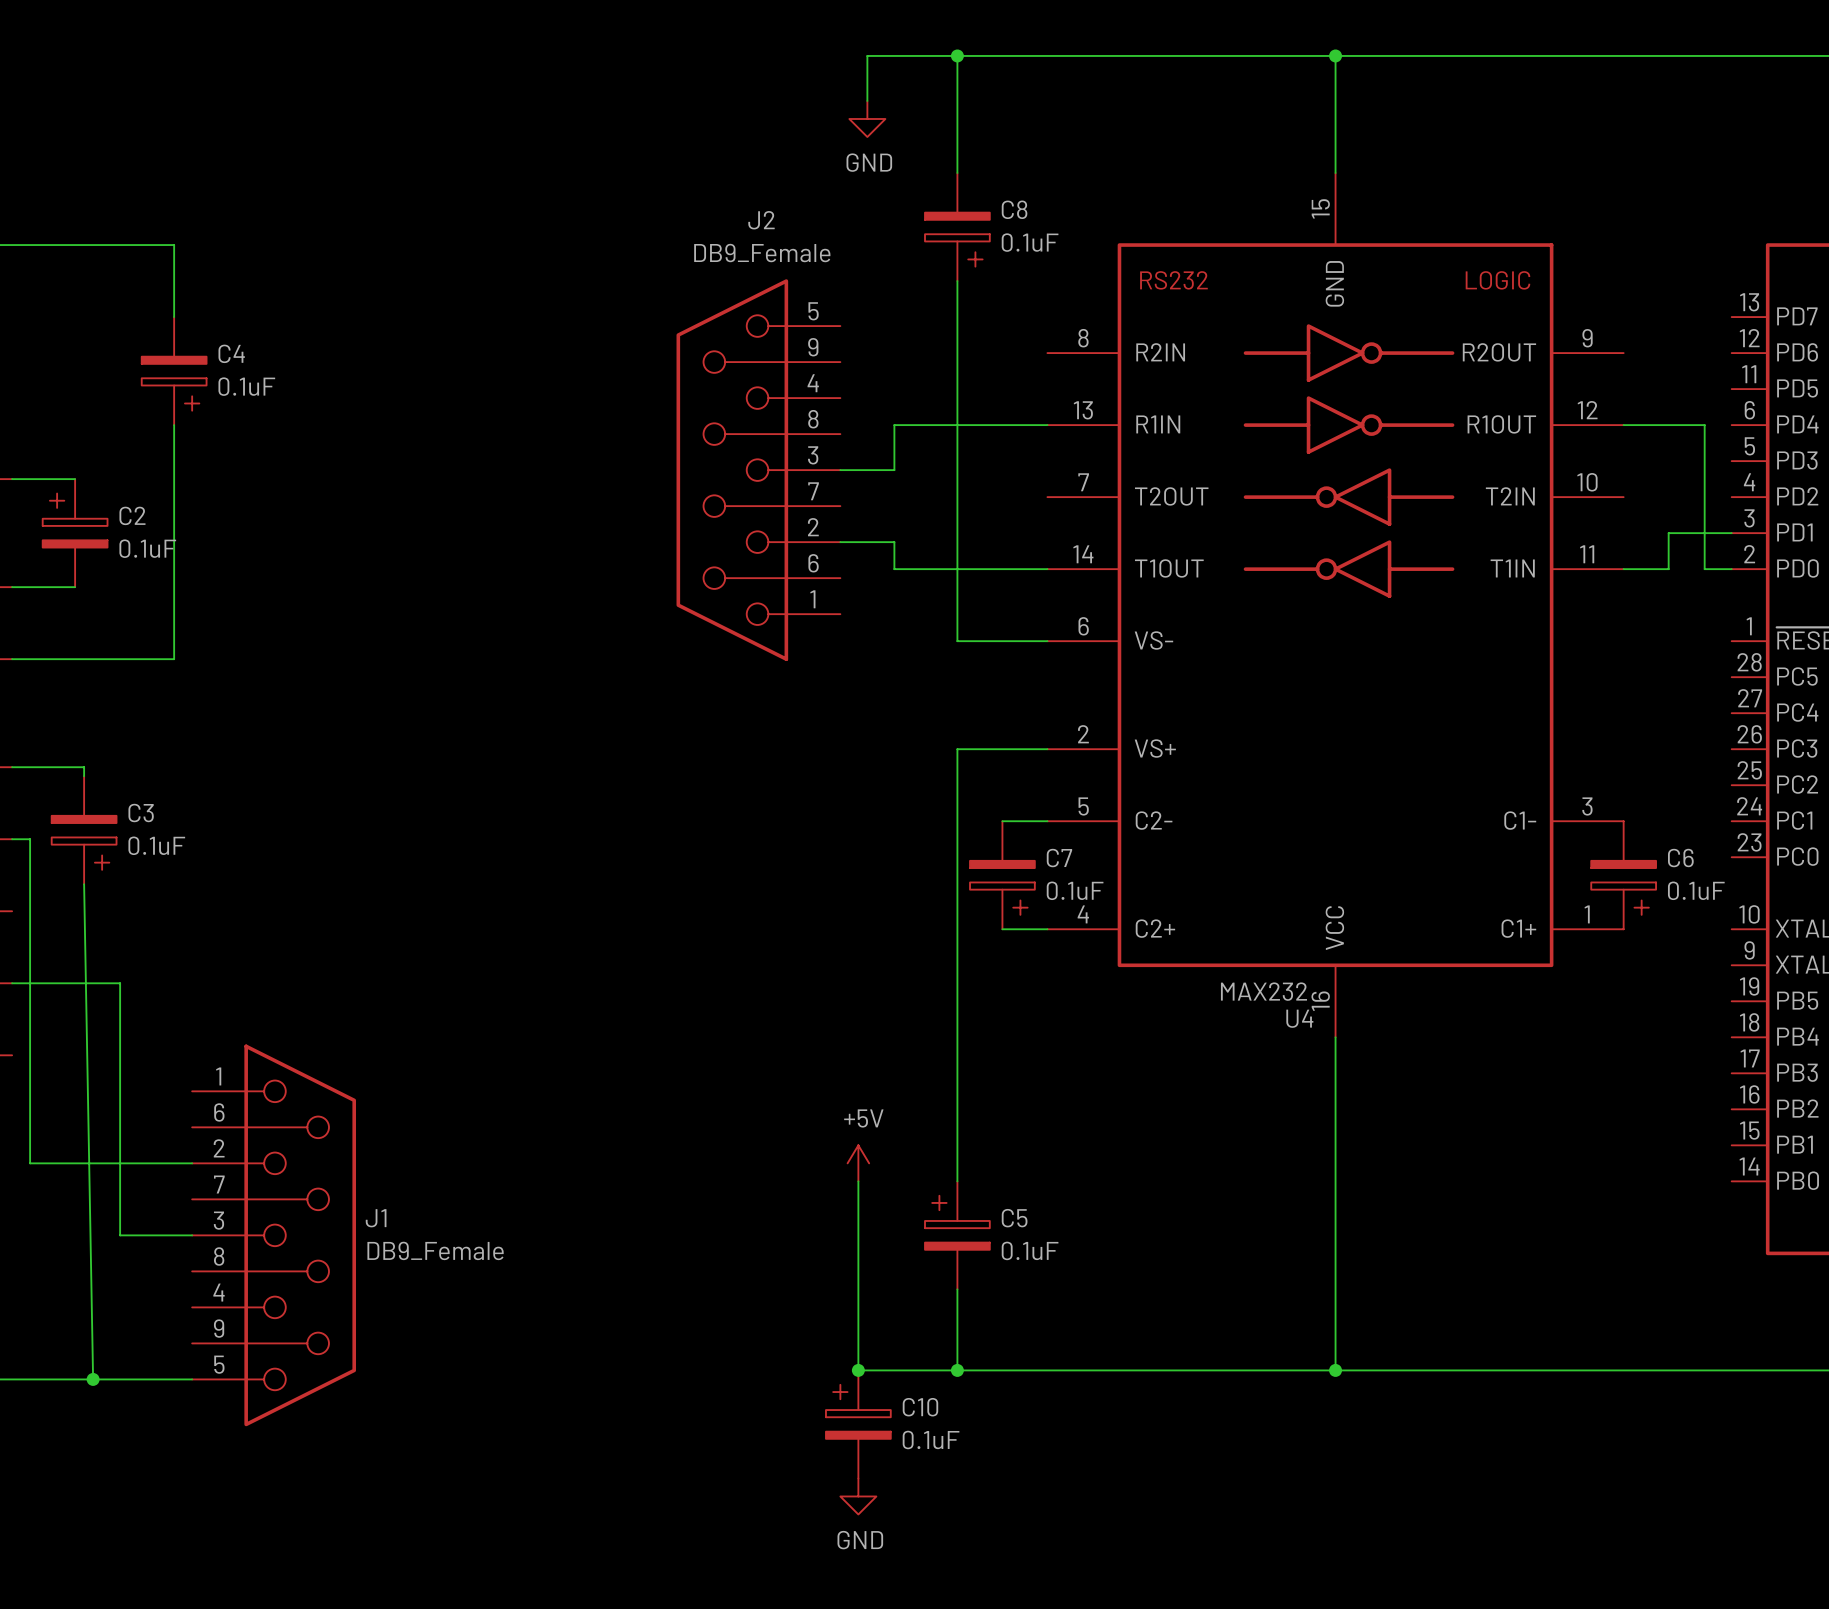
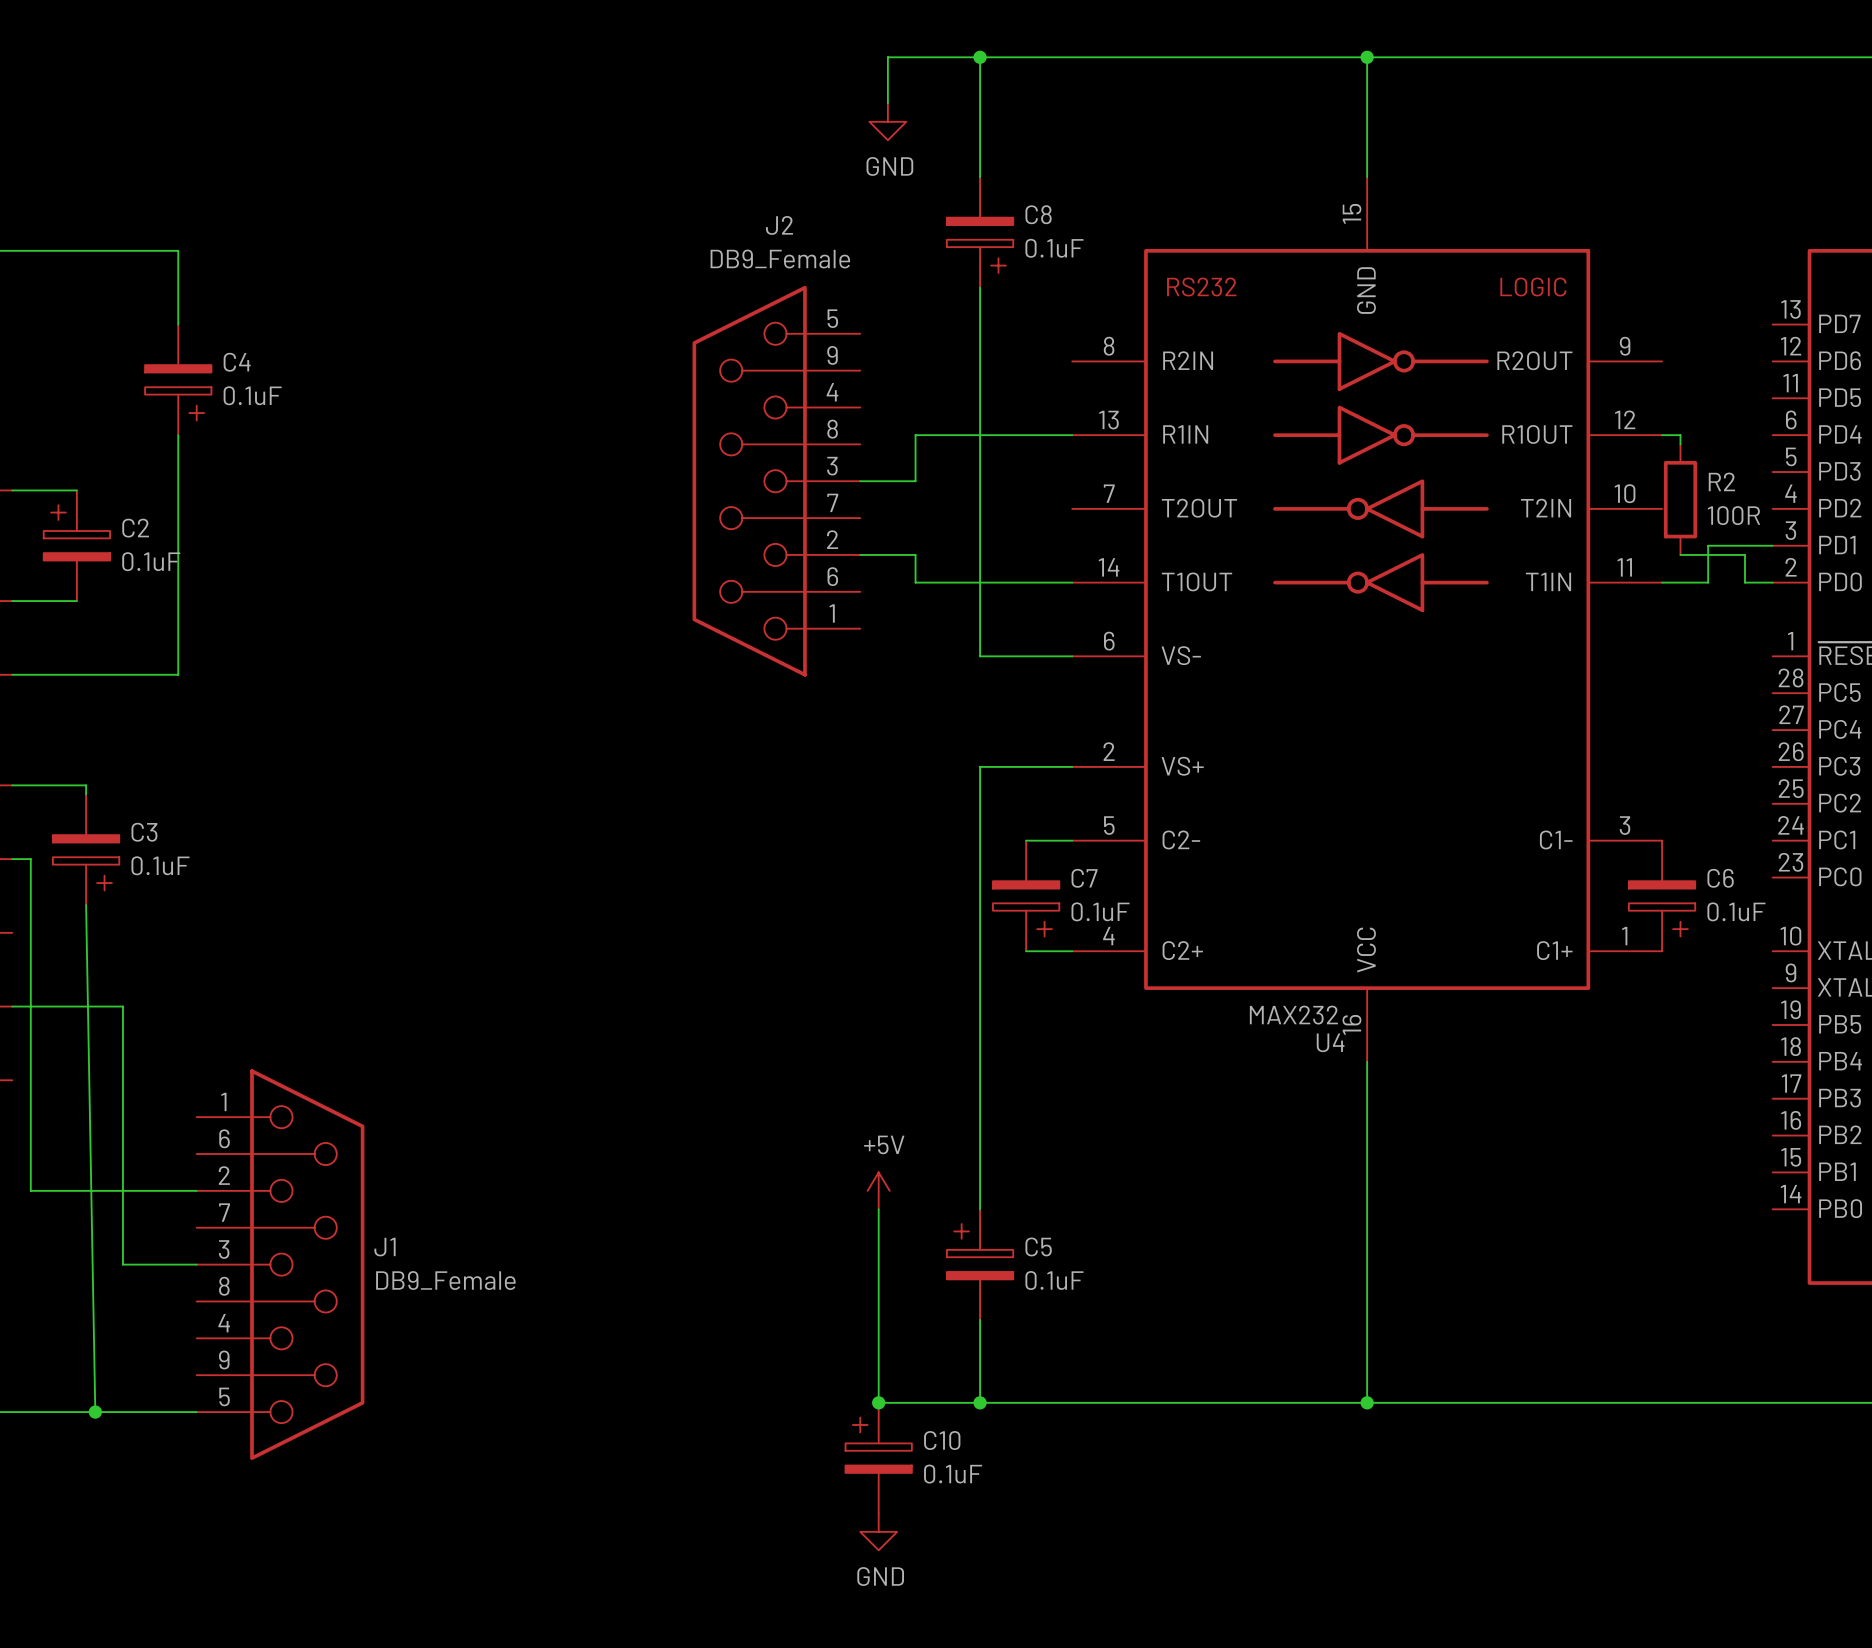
wire: (1641, 425) (1704, 425) (1704, 542) -> (1680, 554) (1745, 554)
wire: none -> (1680, 435) (1680, 444)
R2: none -> 100R (1680, 499)

